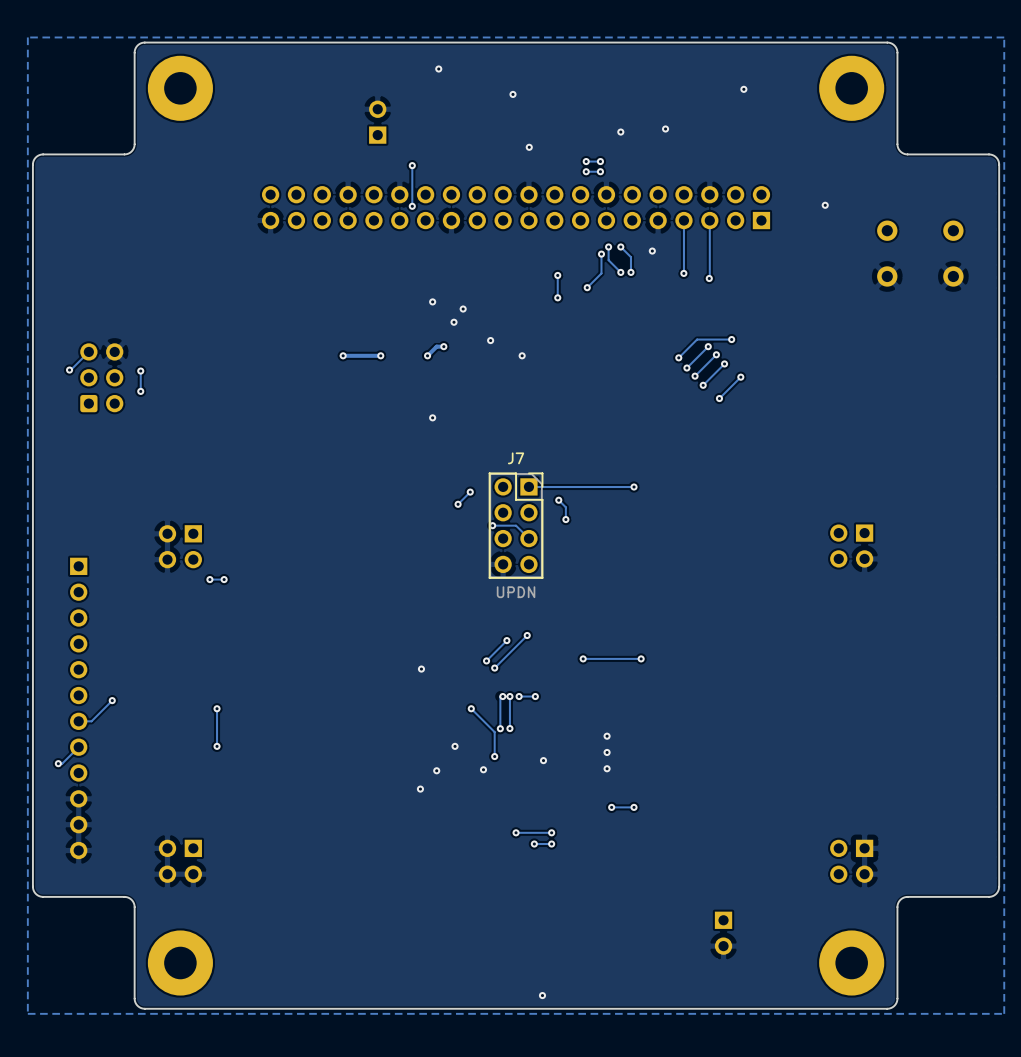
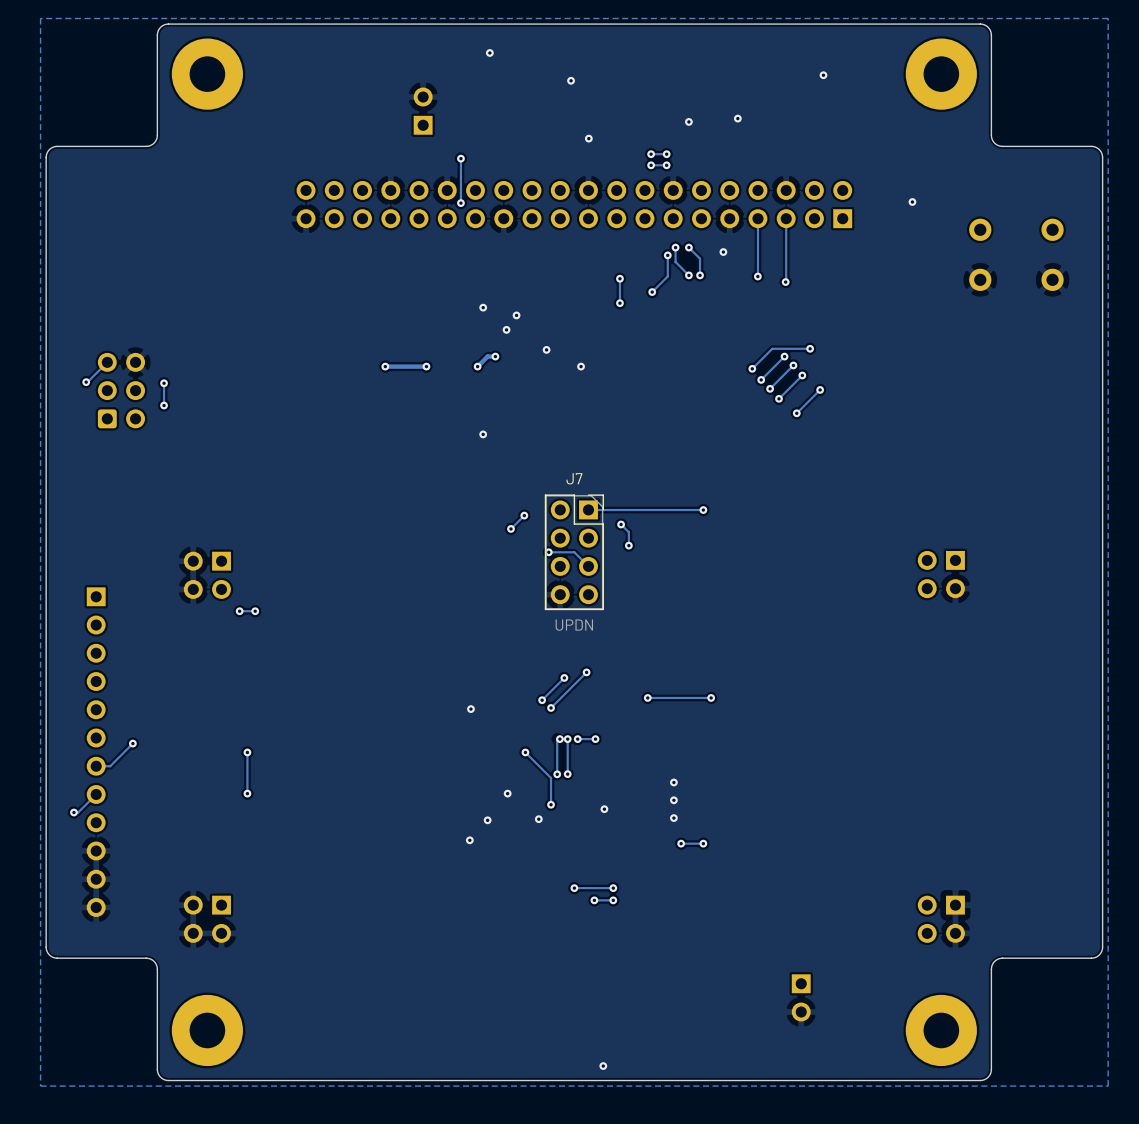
via: none -> (681, 843)
track: none -> (703, 843) (681, 843)
via: none -> (703, 843)
via: (611, 807) -> none
track: (634, 807) (611, 807) -> none
via: (634, 807) -> none

